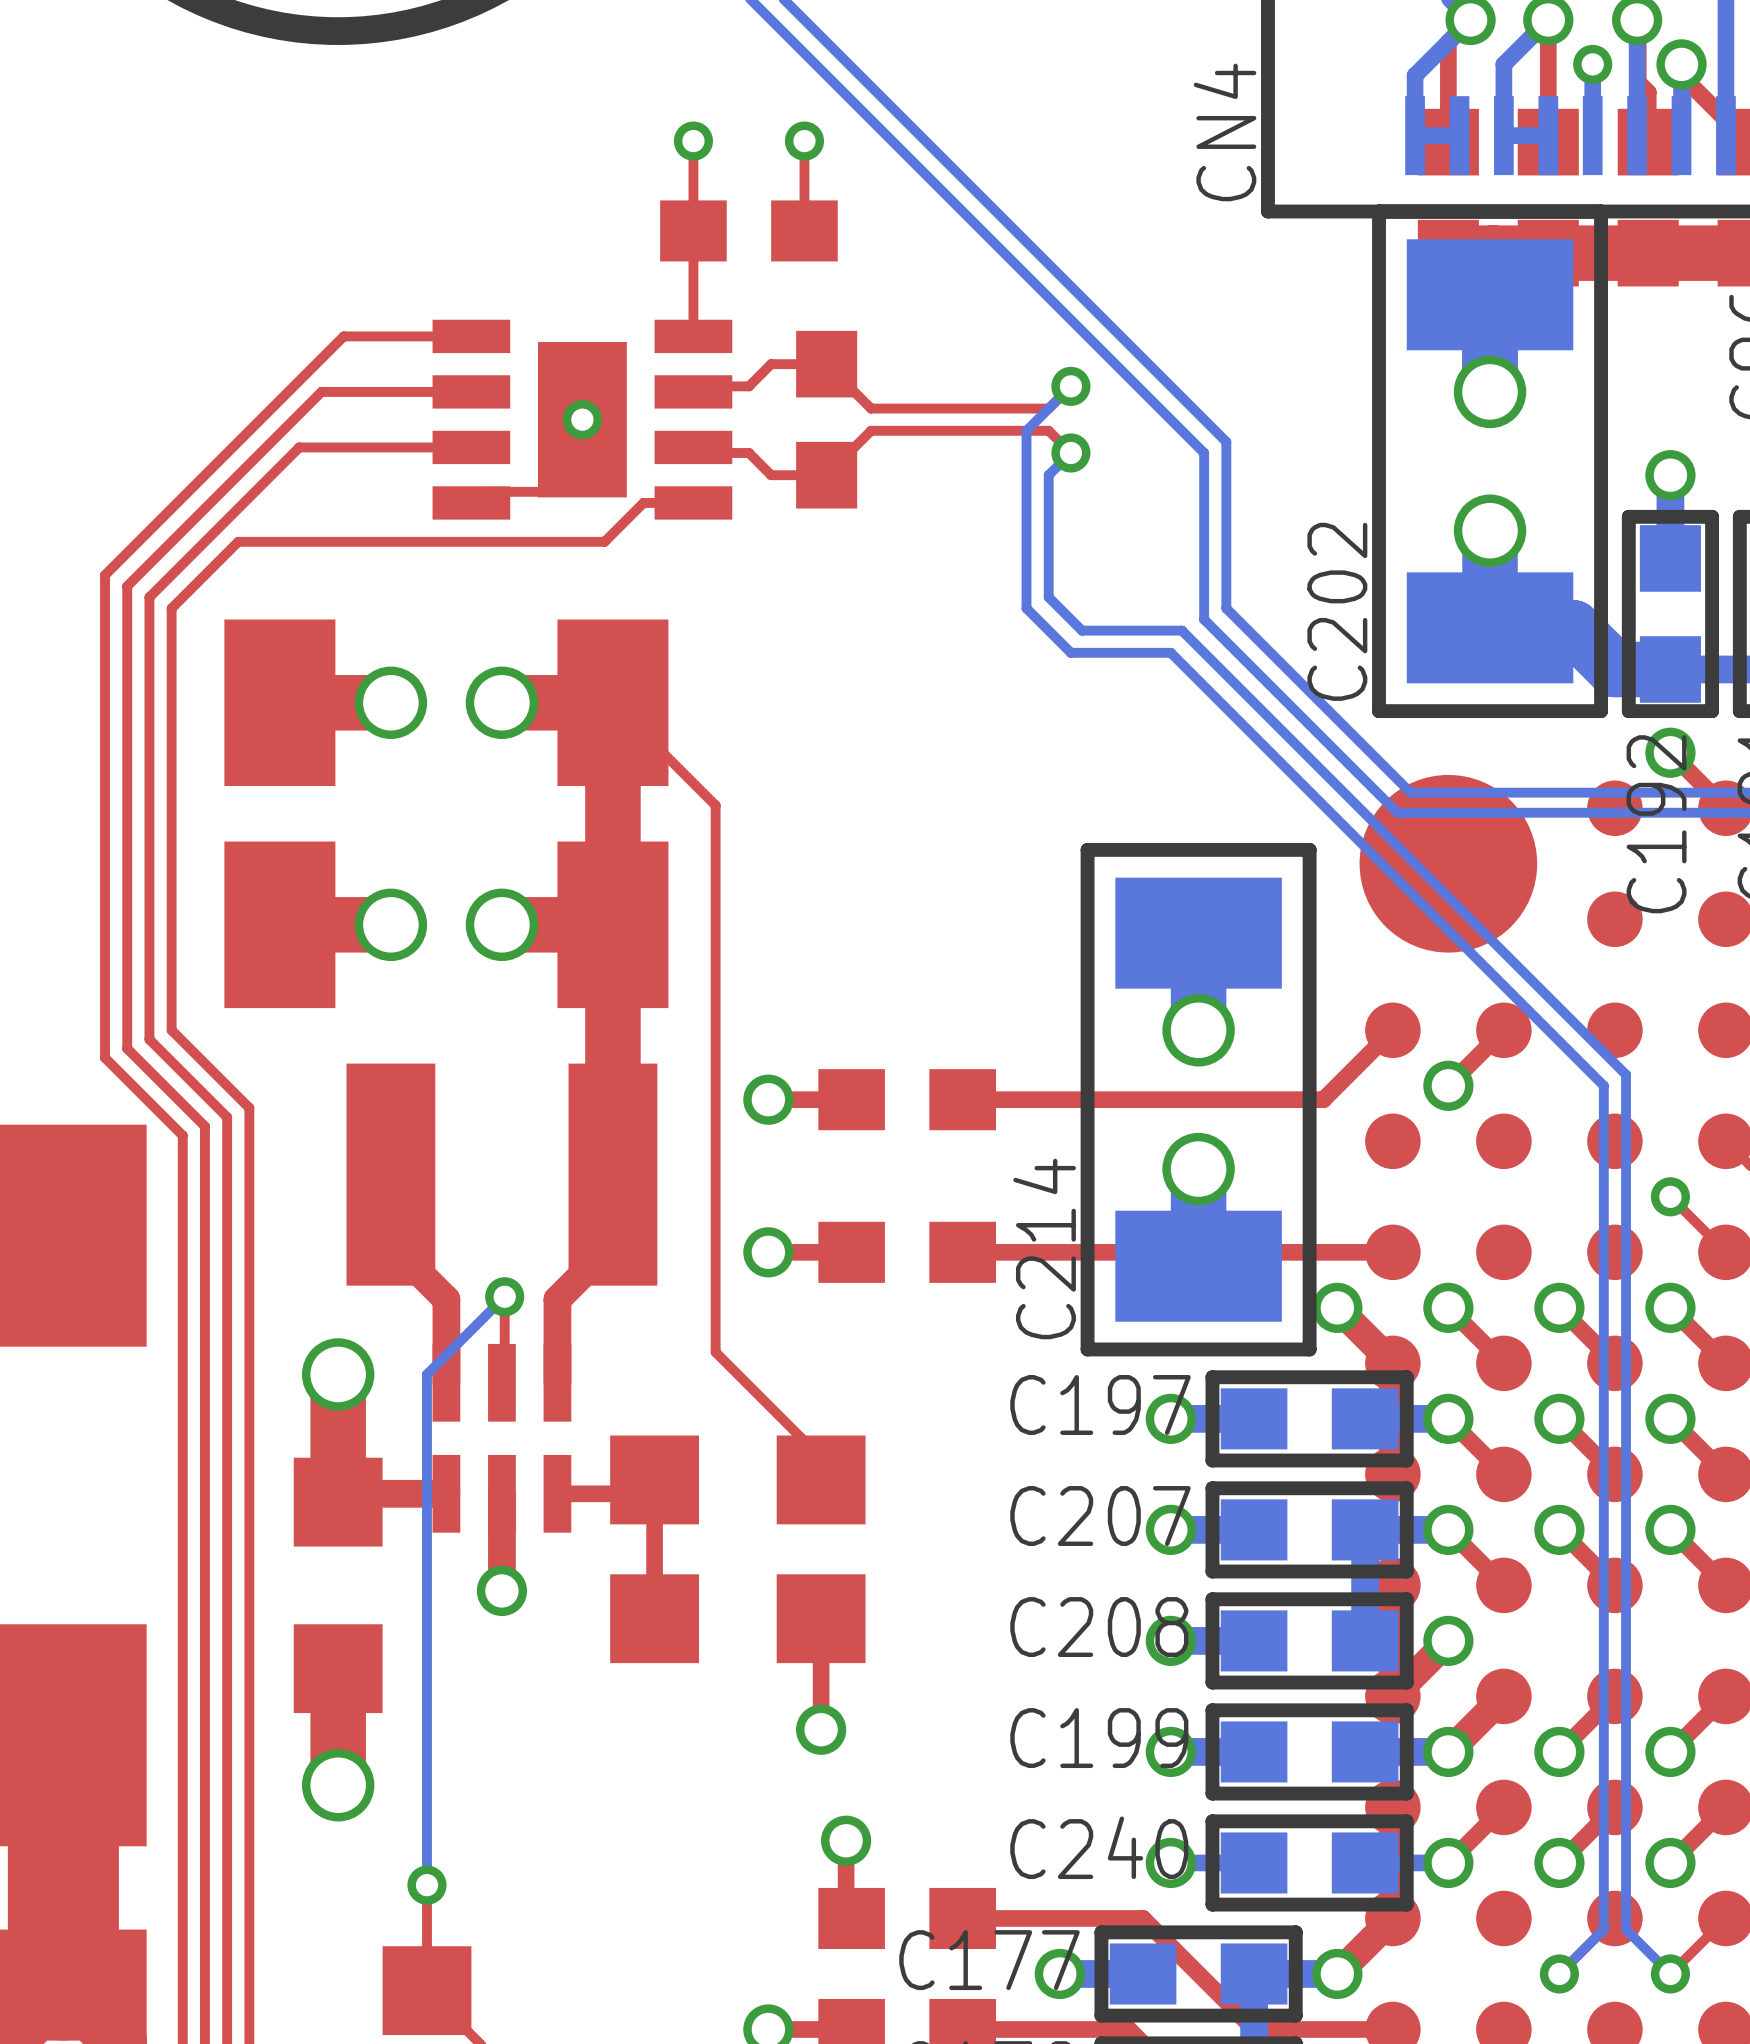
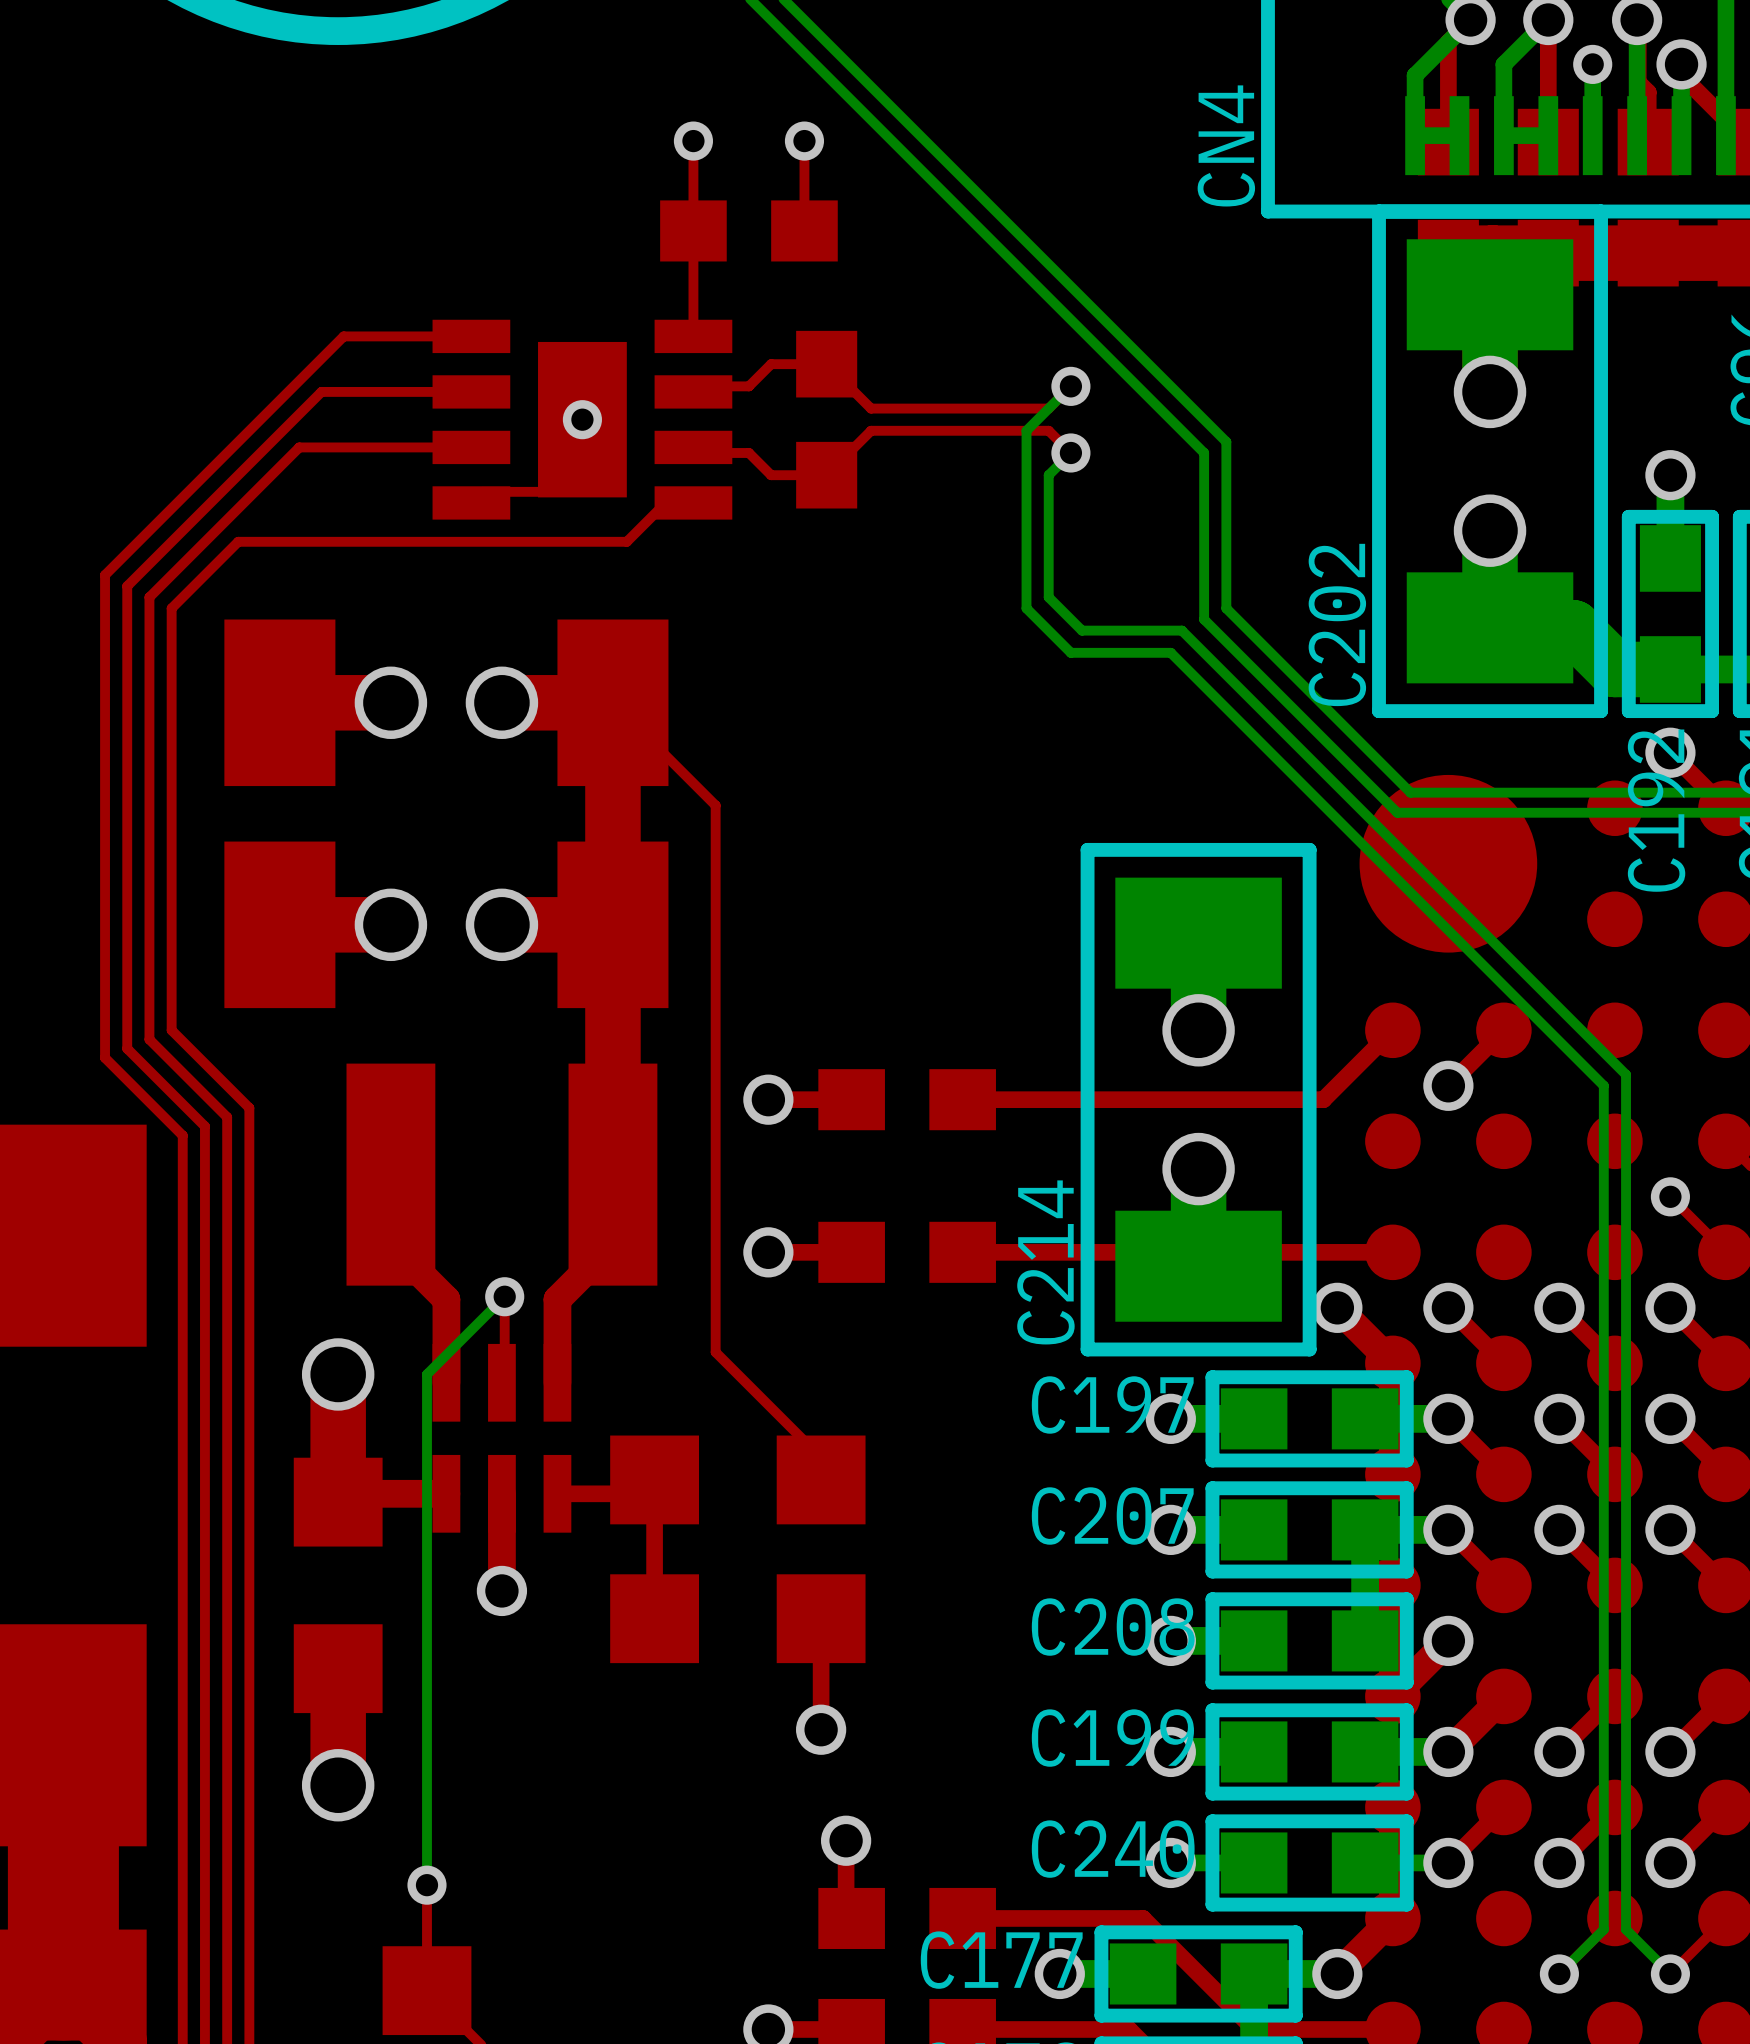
top track: (665, 502) (643, 502) (604, 541) -> (665, 502) (626, 541) (604, 541)

